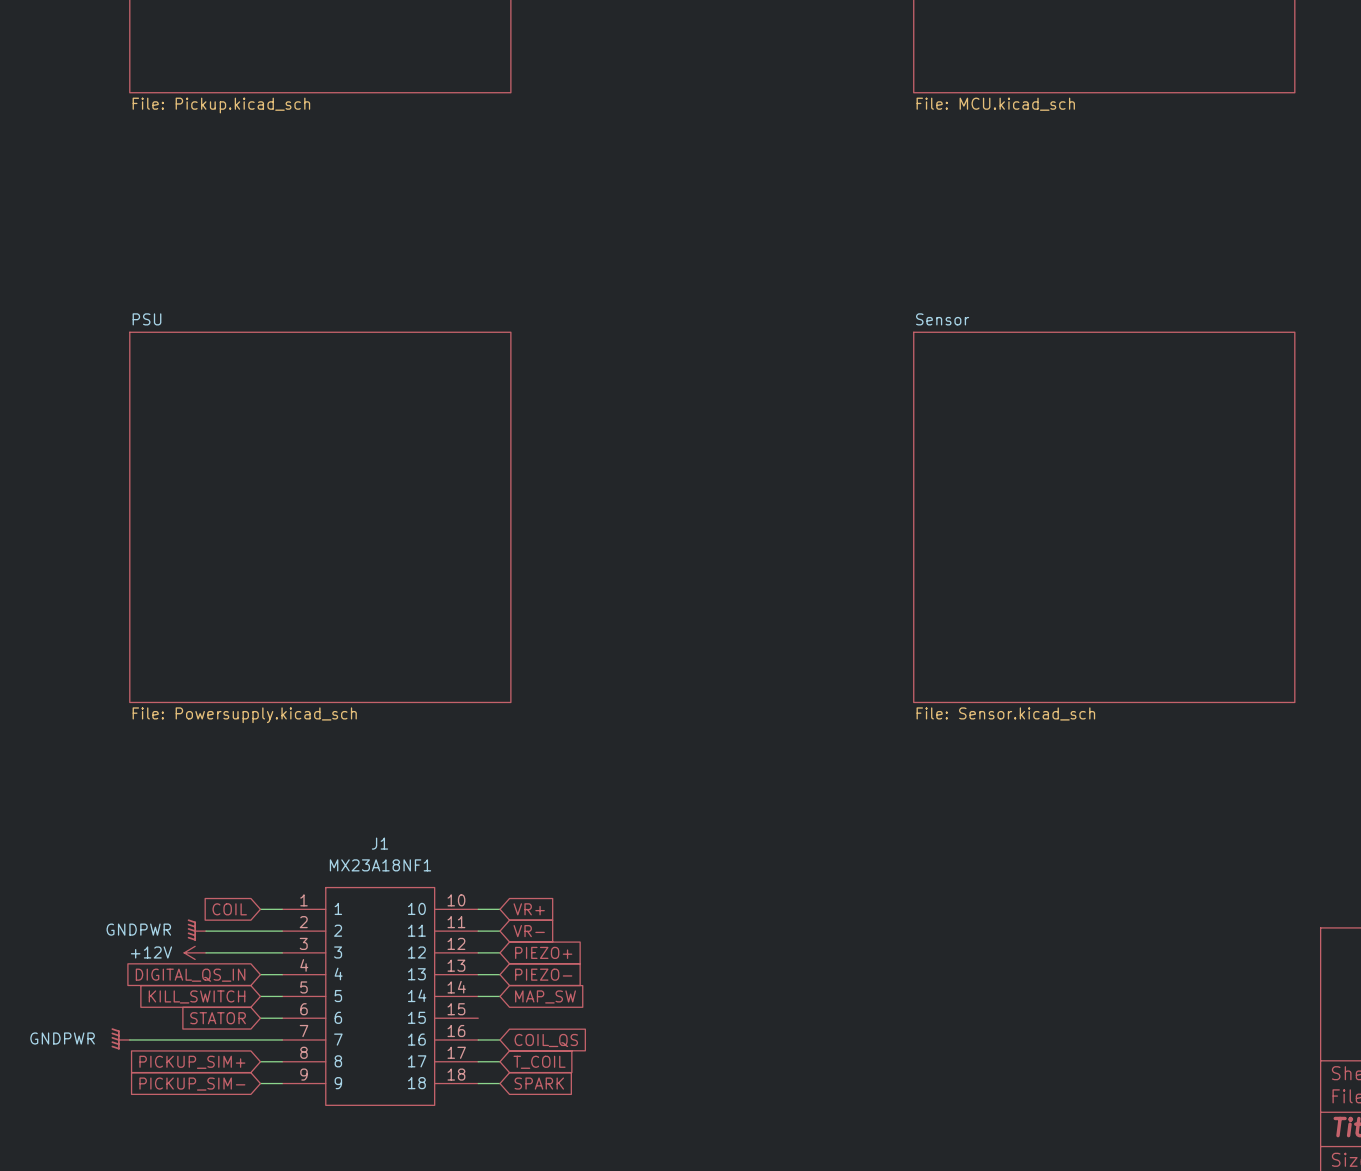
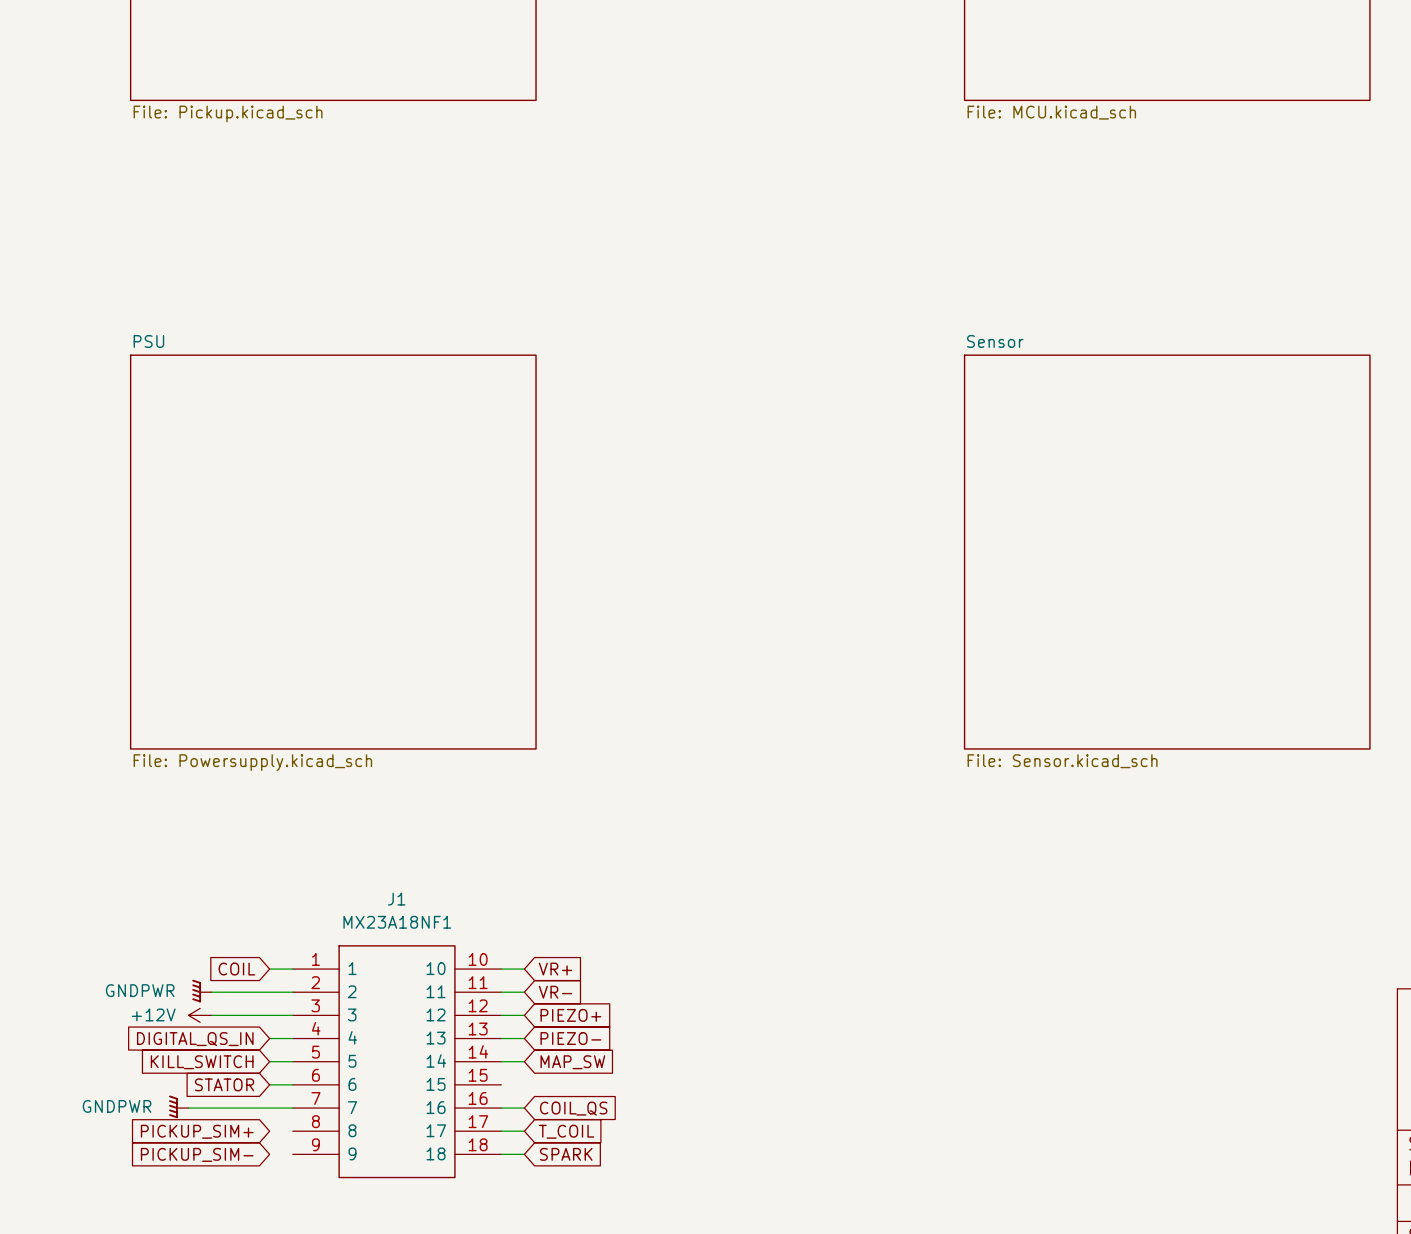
power symbol position: GNDPWR (120, 1038) -> GNDPWR (178, 1106)
wire: (129, 1039) (184, 1039) -> none
wire: (260, 1061) (282, 1061) -> none
wire: (260, 1083) (282, 1083) -> none

